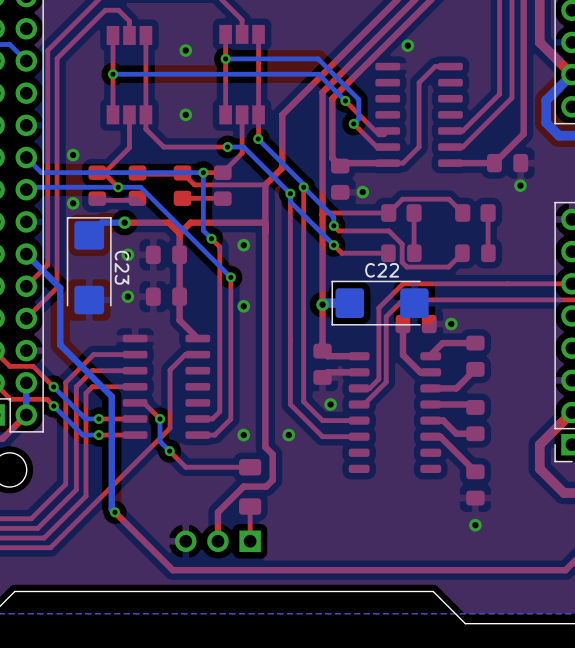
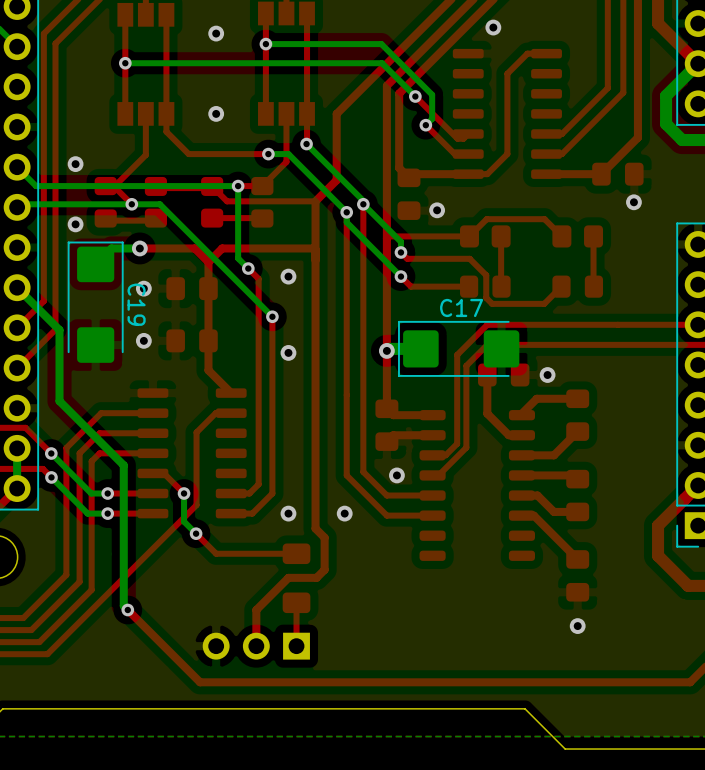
C23 name: C23 (122, 267) -> C19 (136, 304)
C22 name: C22 (382, 270) -> C17 (461, 307)

